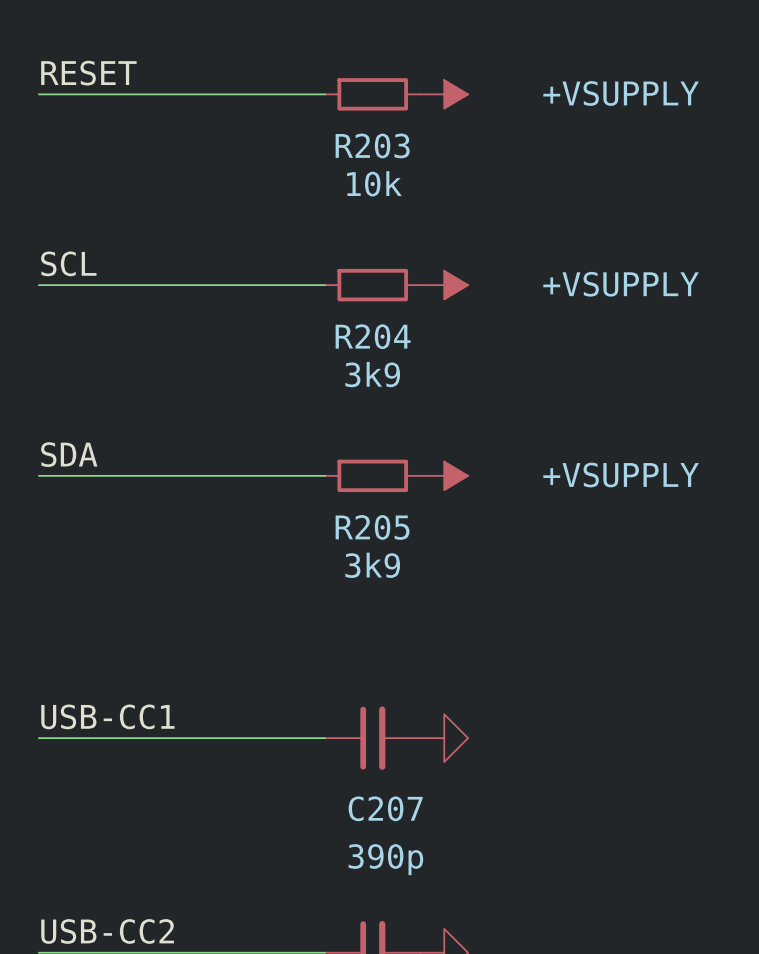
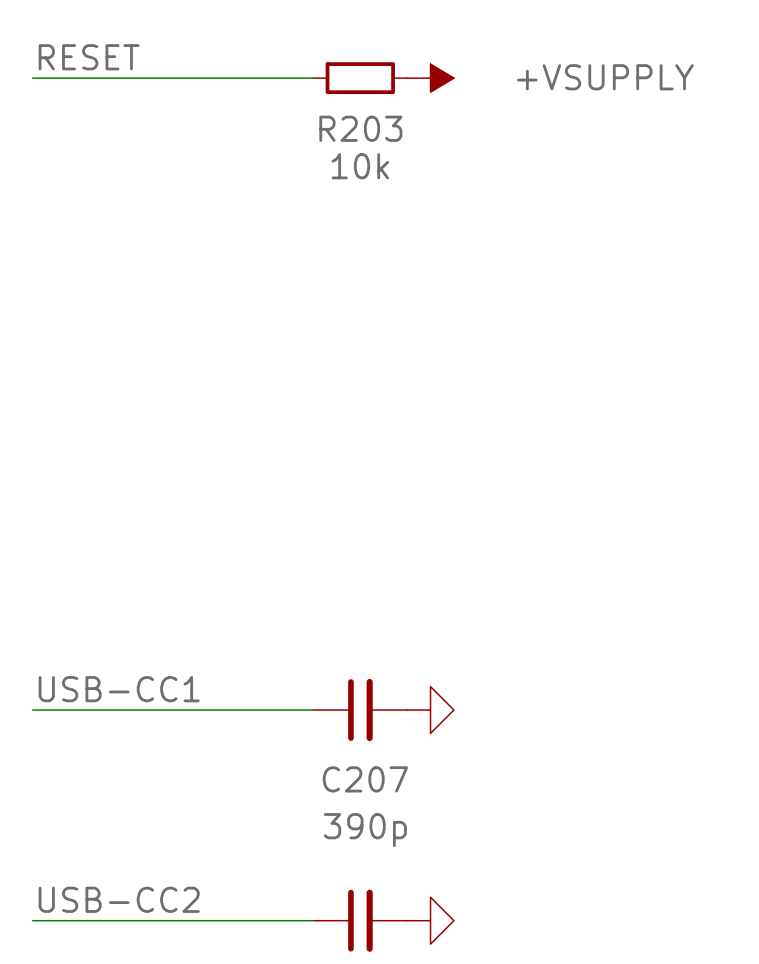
label: SCL (68, 263) -> none
wire: (38, 285) (325, 285) -> none
R204: 3k9 (372, 285) -> none
power symbol: +VSUPPLY (444, 285) -> none
label: SDA (69, 454) -> none
wire: (38, 475) (325, 475) -> none
R205: 3k9 (372, 475) -> none
power symbol: +VSUPPLY (444, 475) -> none

